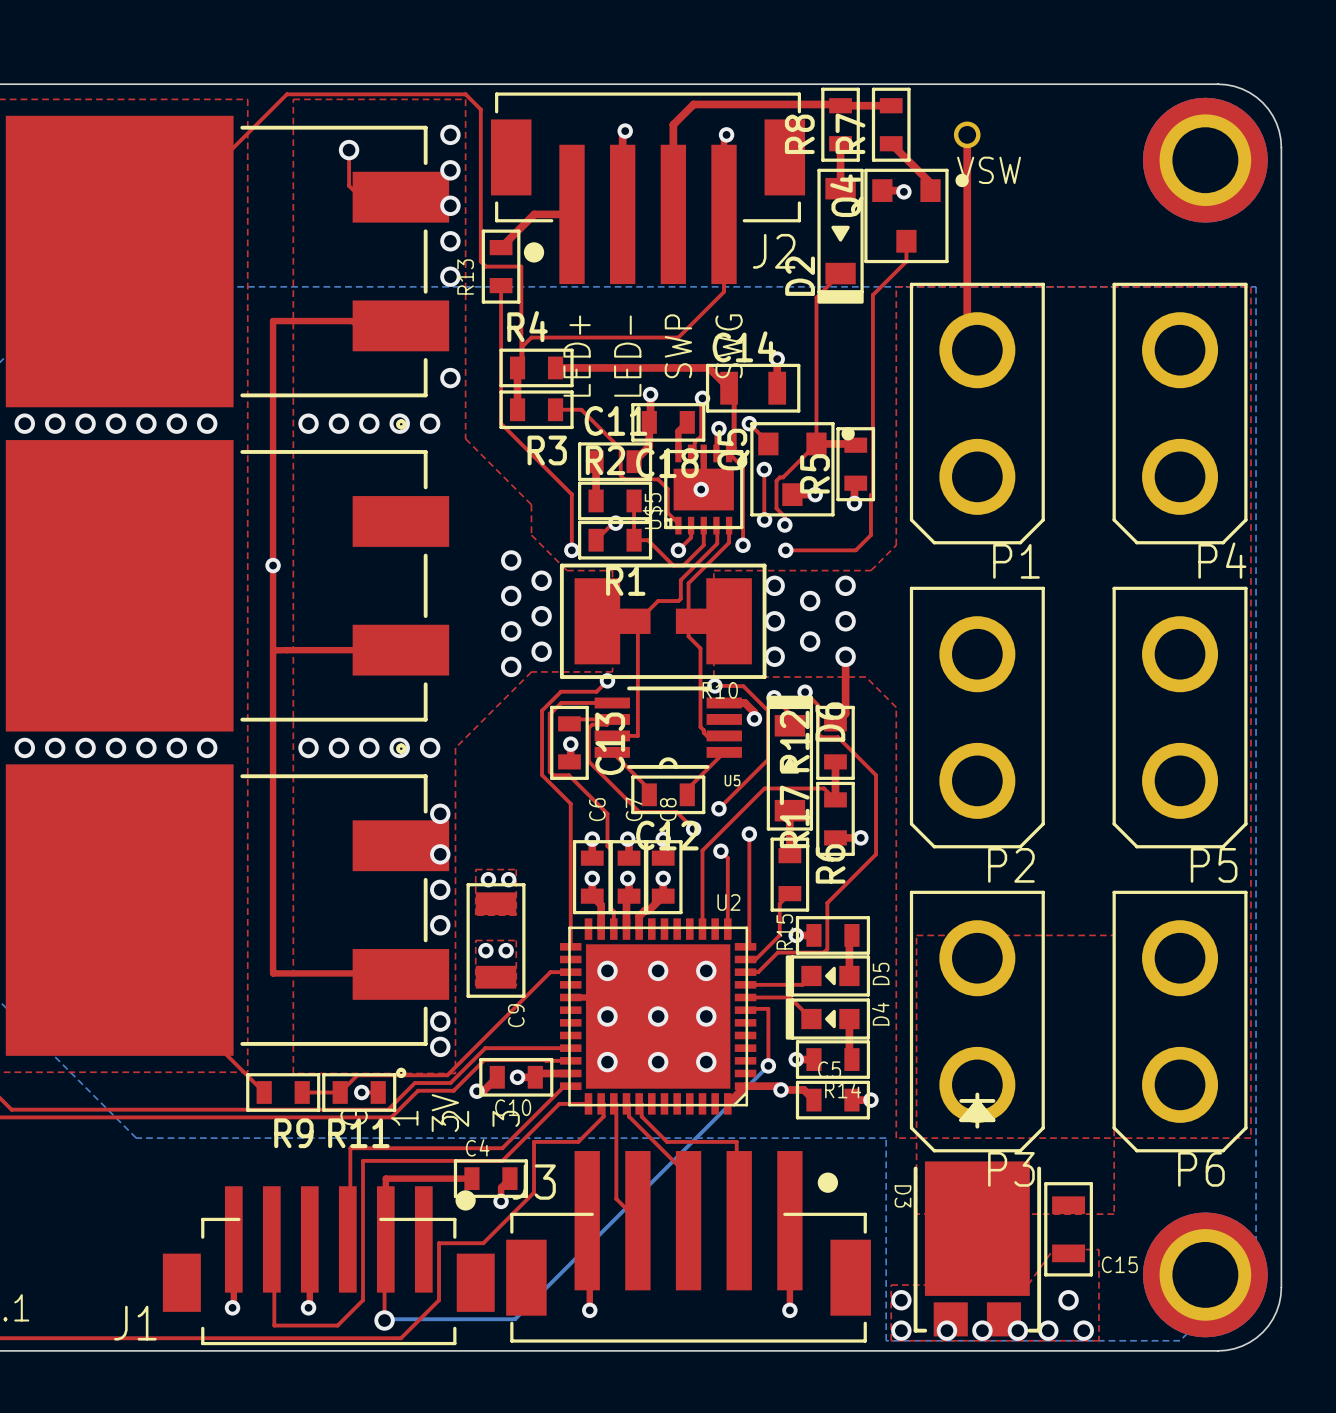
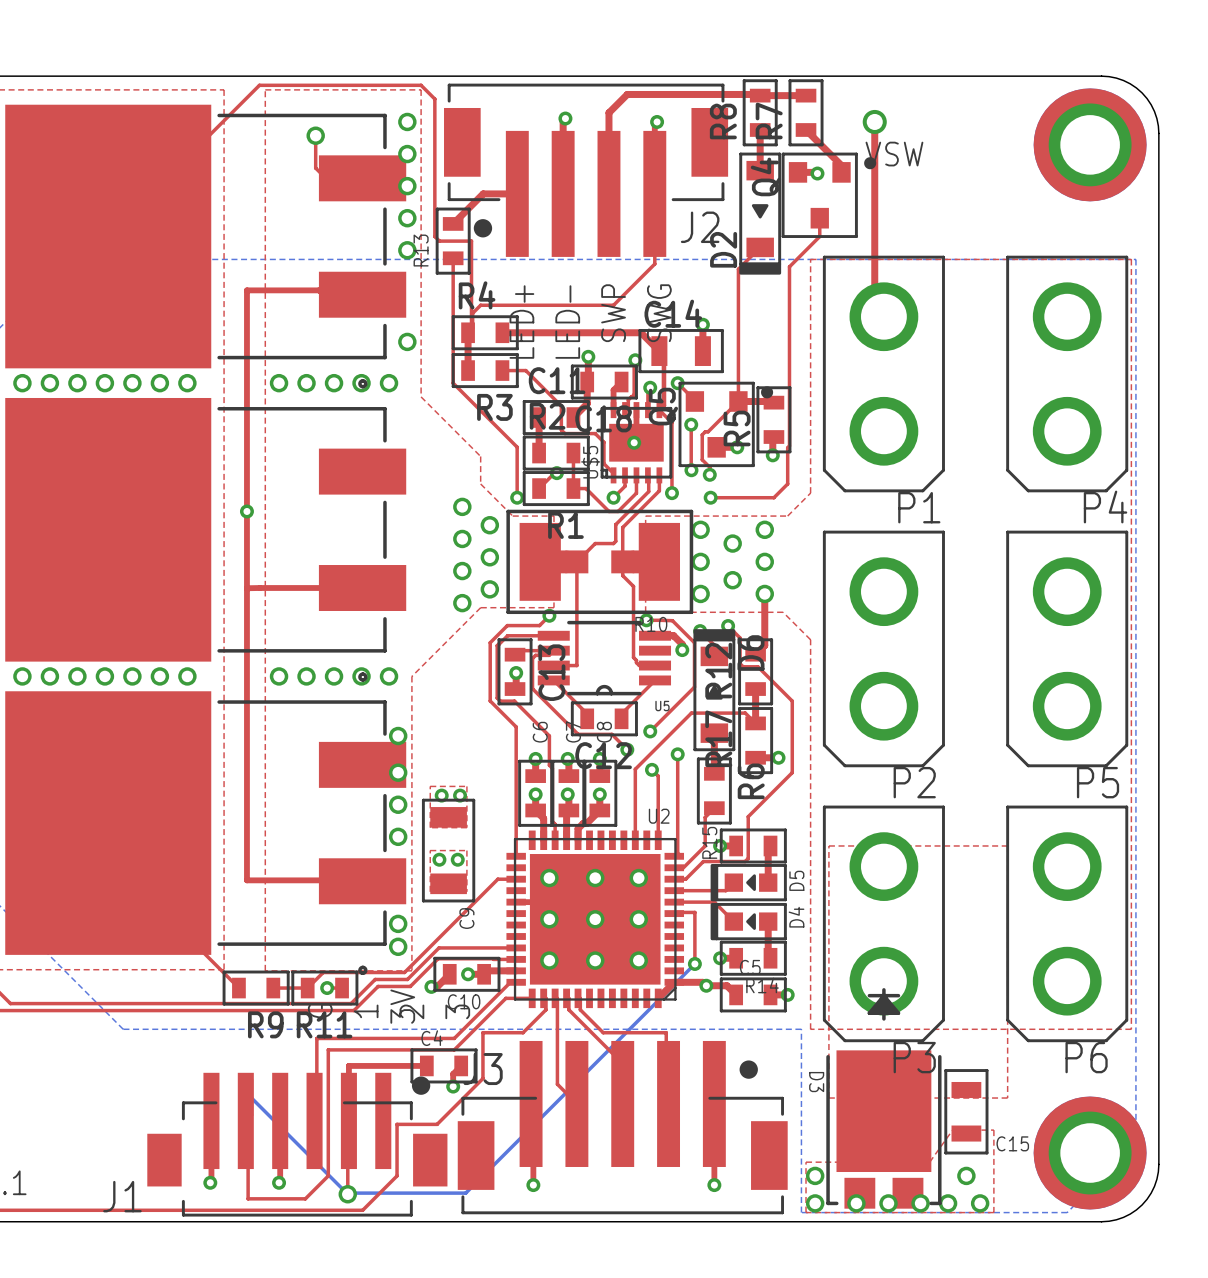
bottom track: none -> (246, 1098) (251, 1098) (347, 1194)

